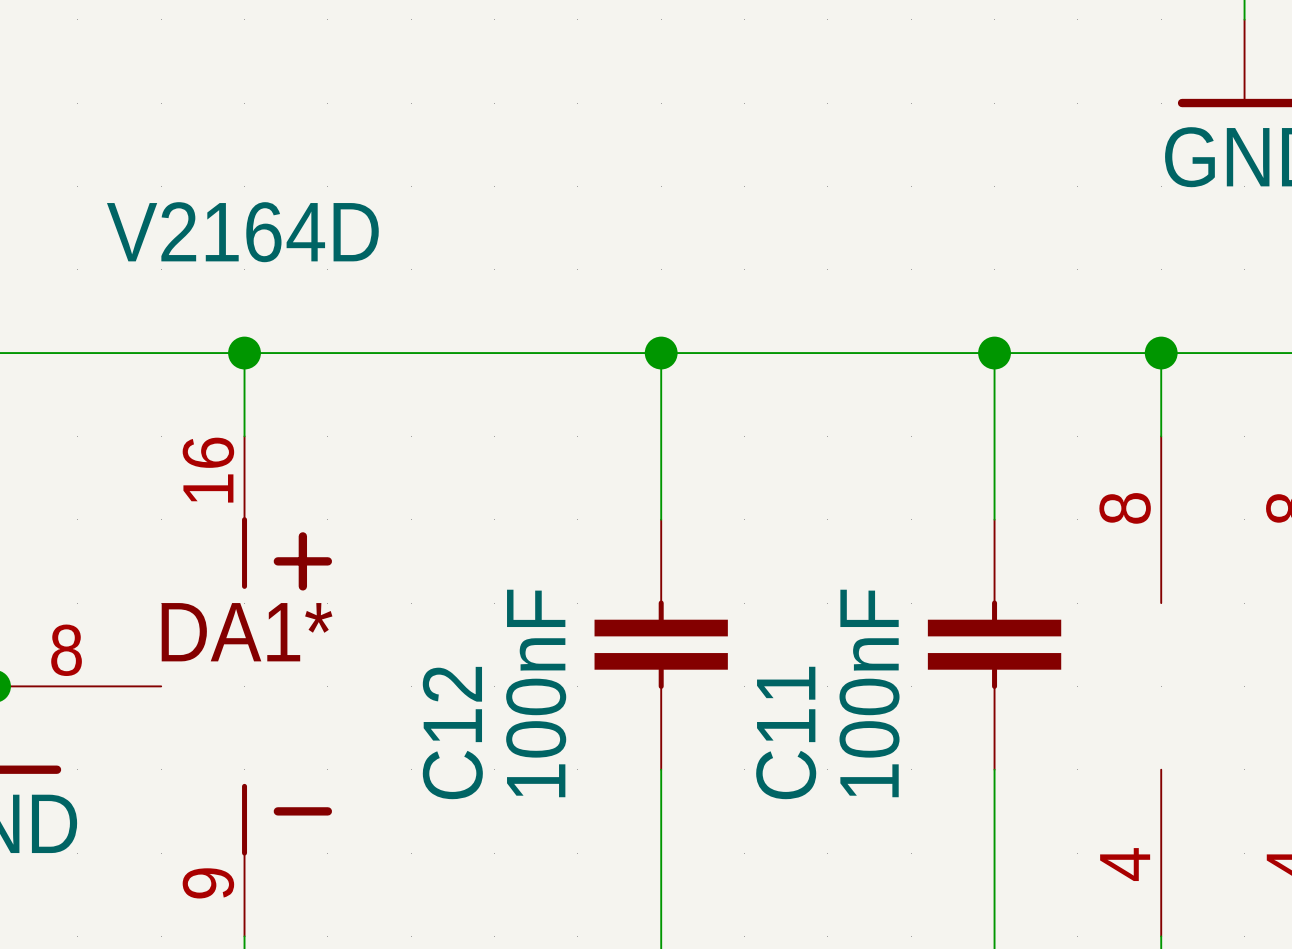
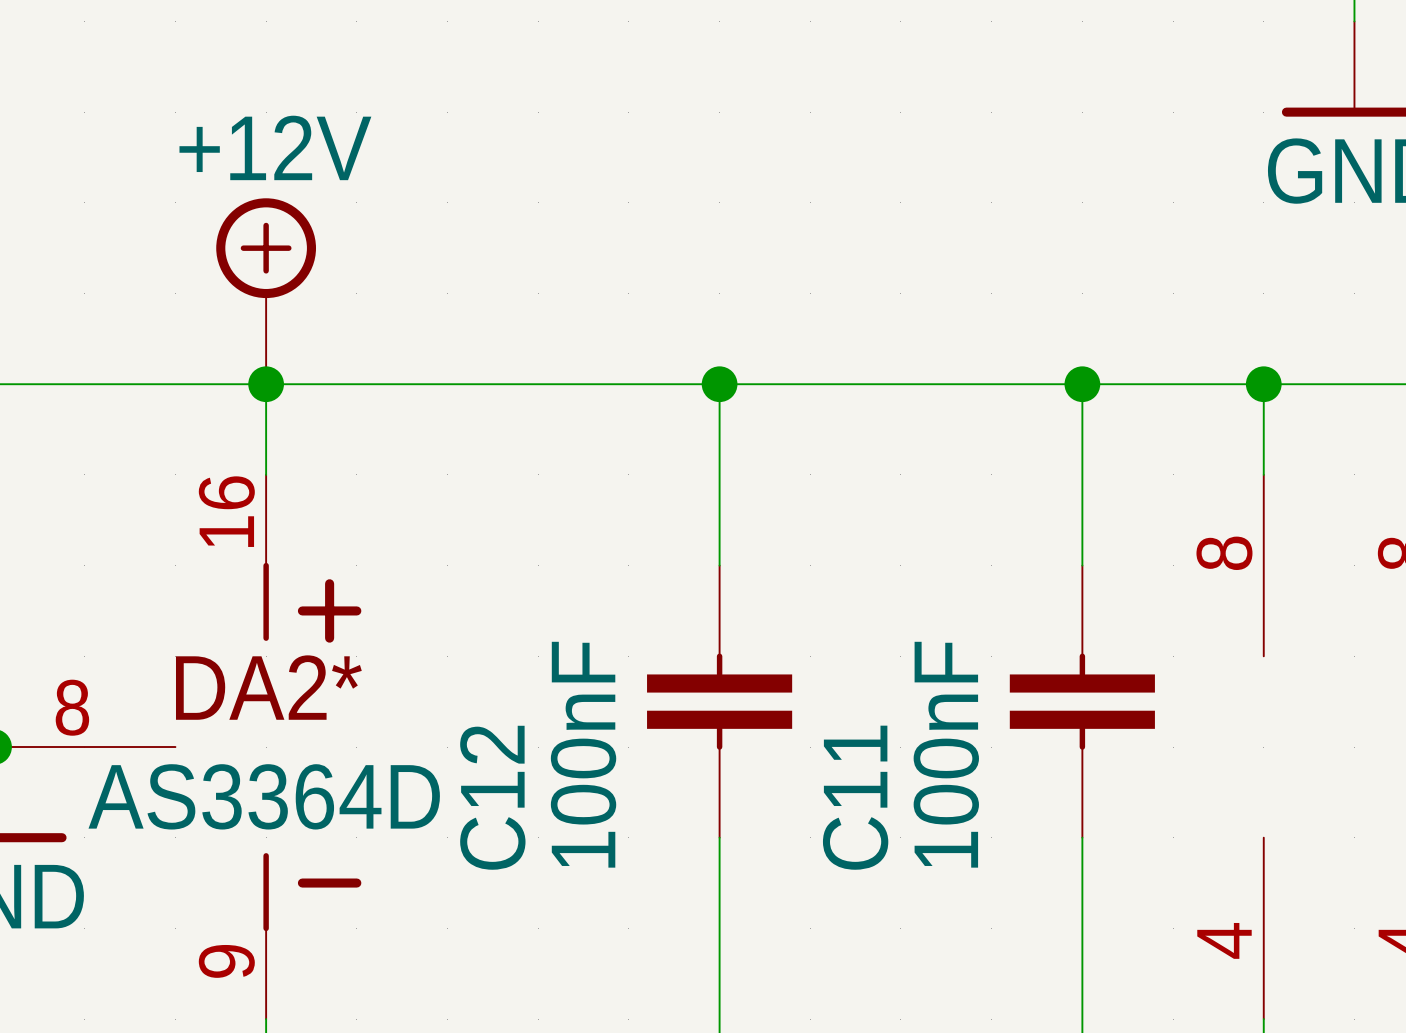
DA1* value: V2164D (242, 232) -> AS3364D (264, 796)
power symbol: none -> +12V (266, 291)
DA1* name: DA1* (247, 632) -> DA2* (268, 687)

